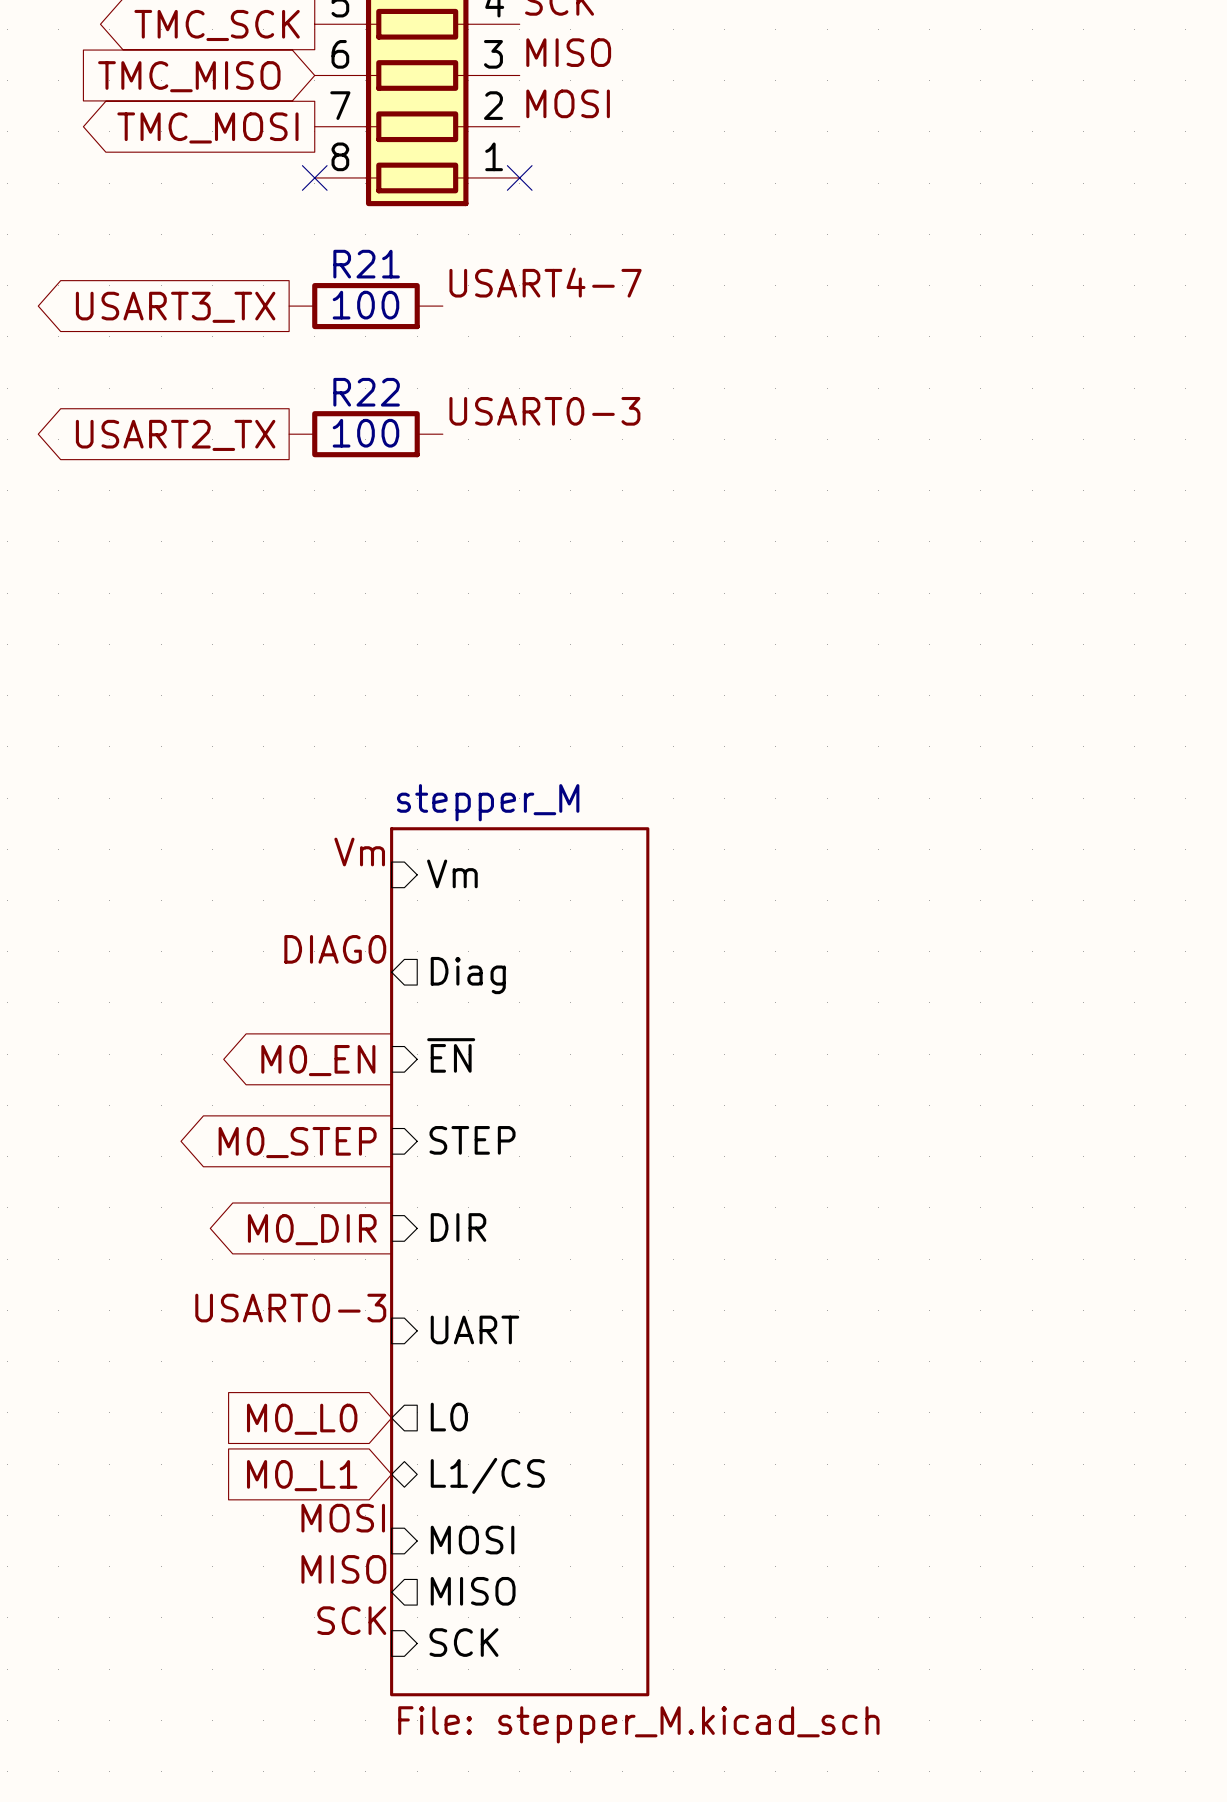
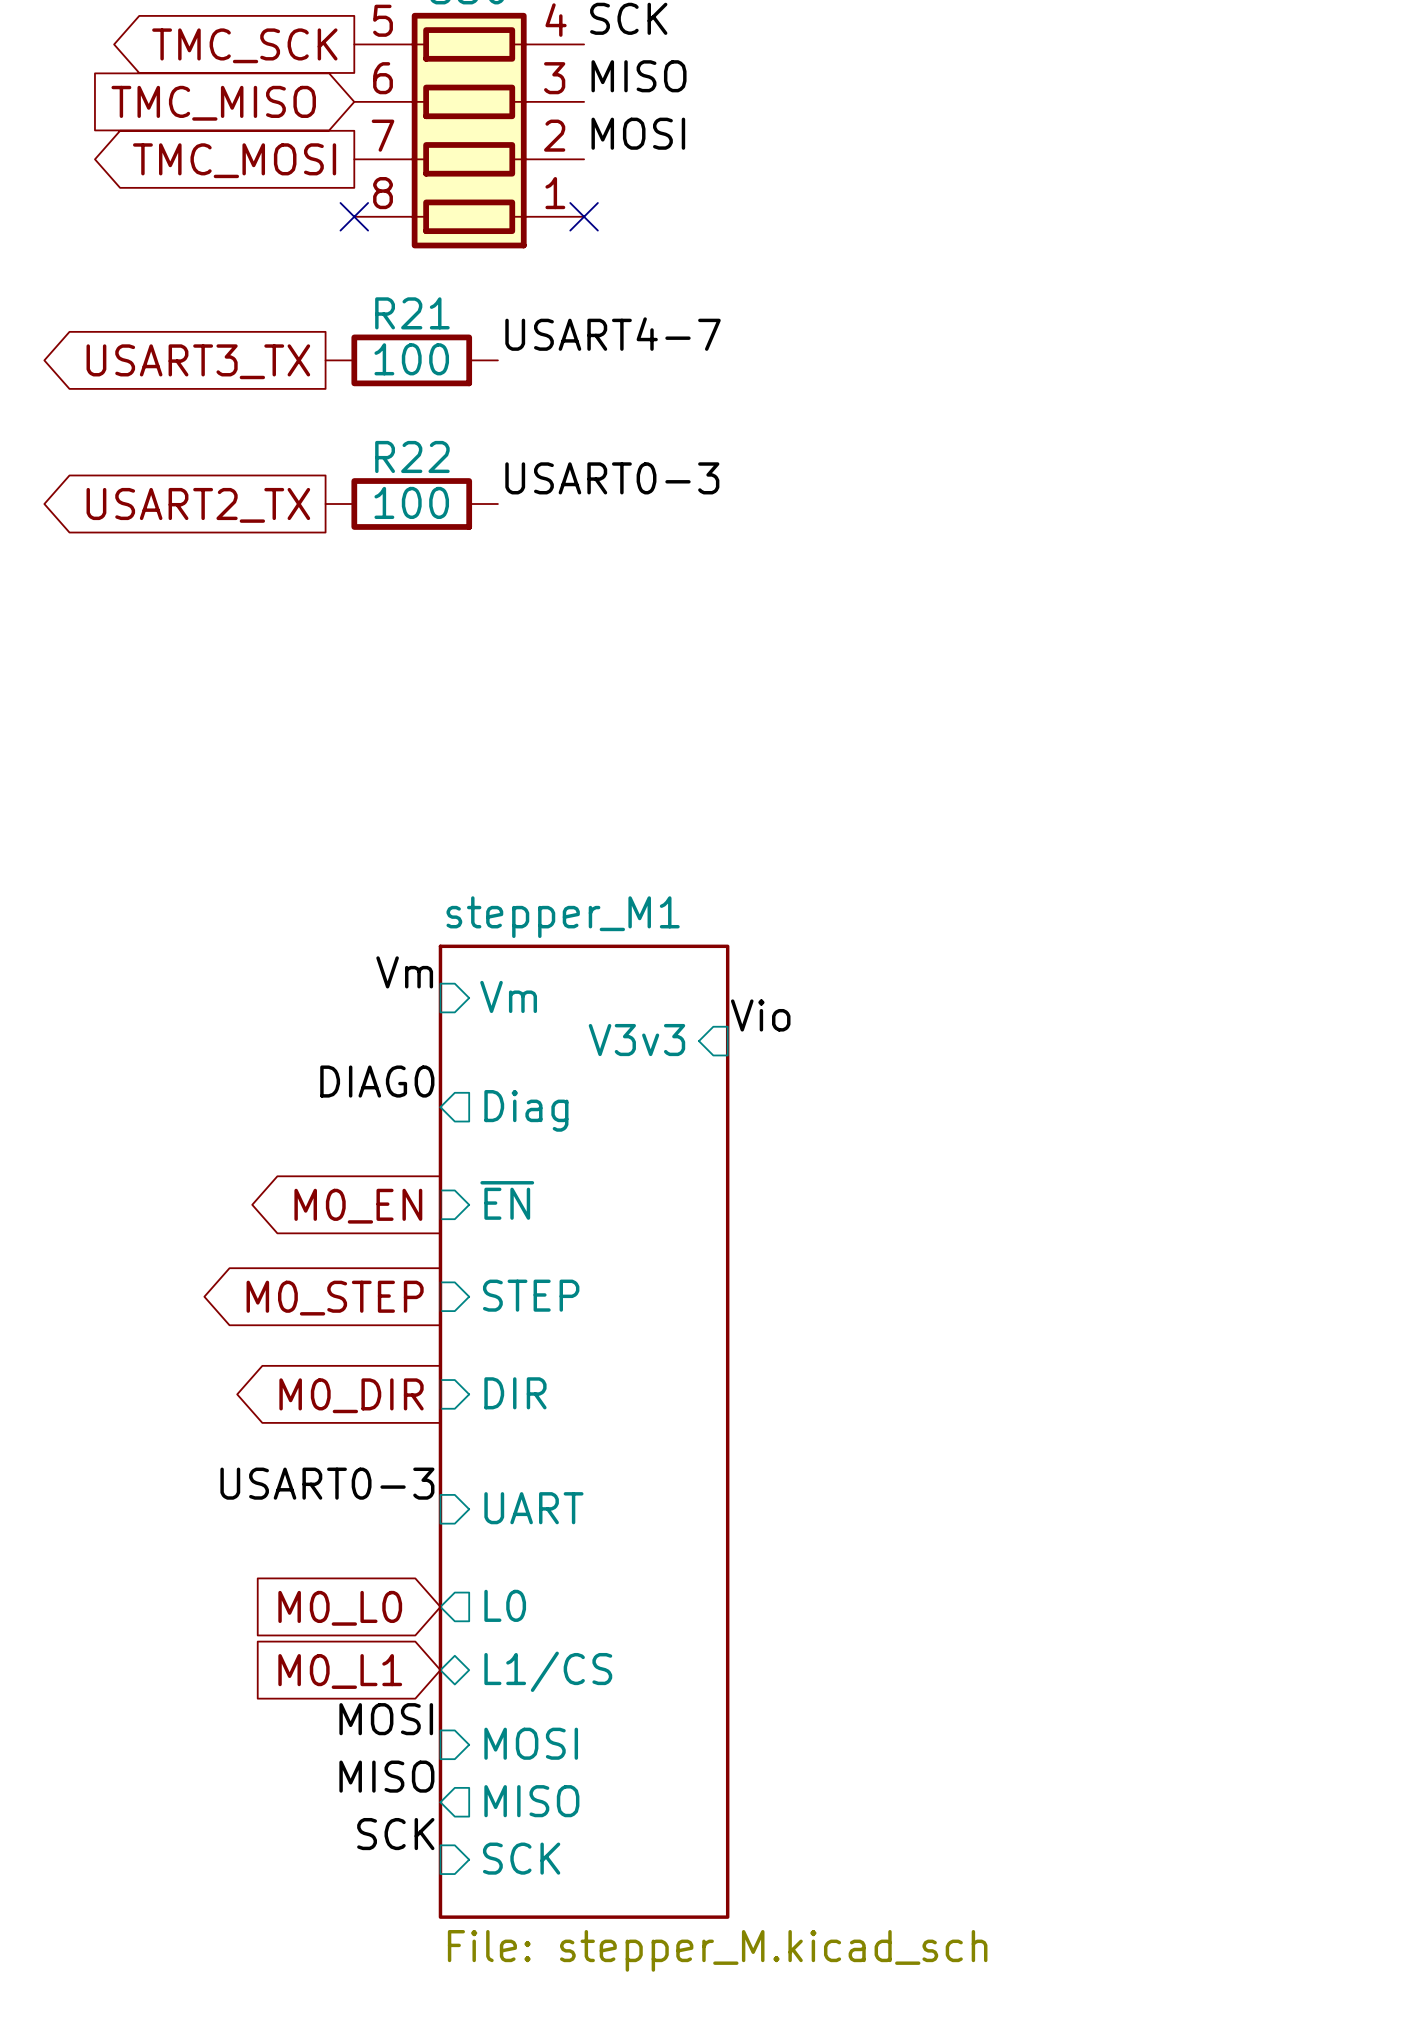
sheet stepper_M name: stepper_M (488, 802) -> stepper_M1 (563, 917)
label: none -> Vio (760, 1015)
sheet pin: none -> V3v3 (636, 1040)

